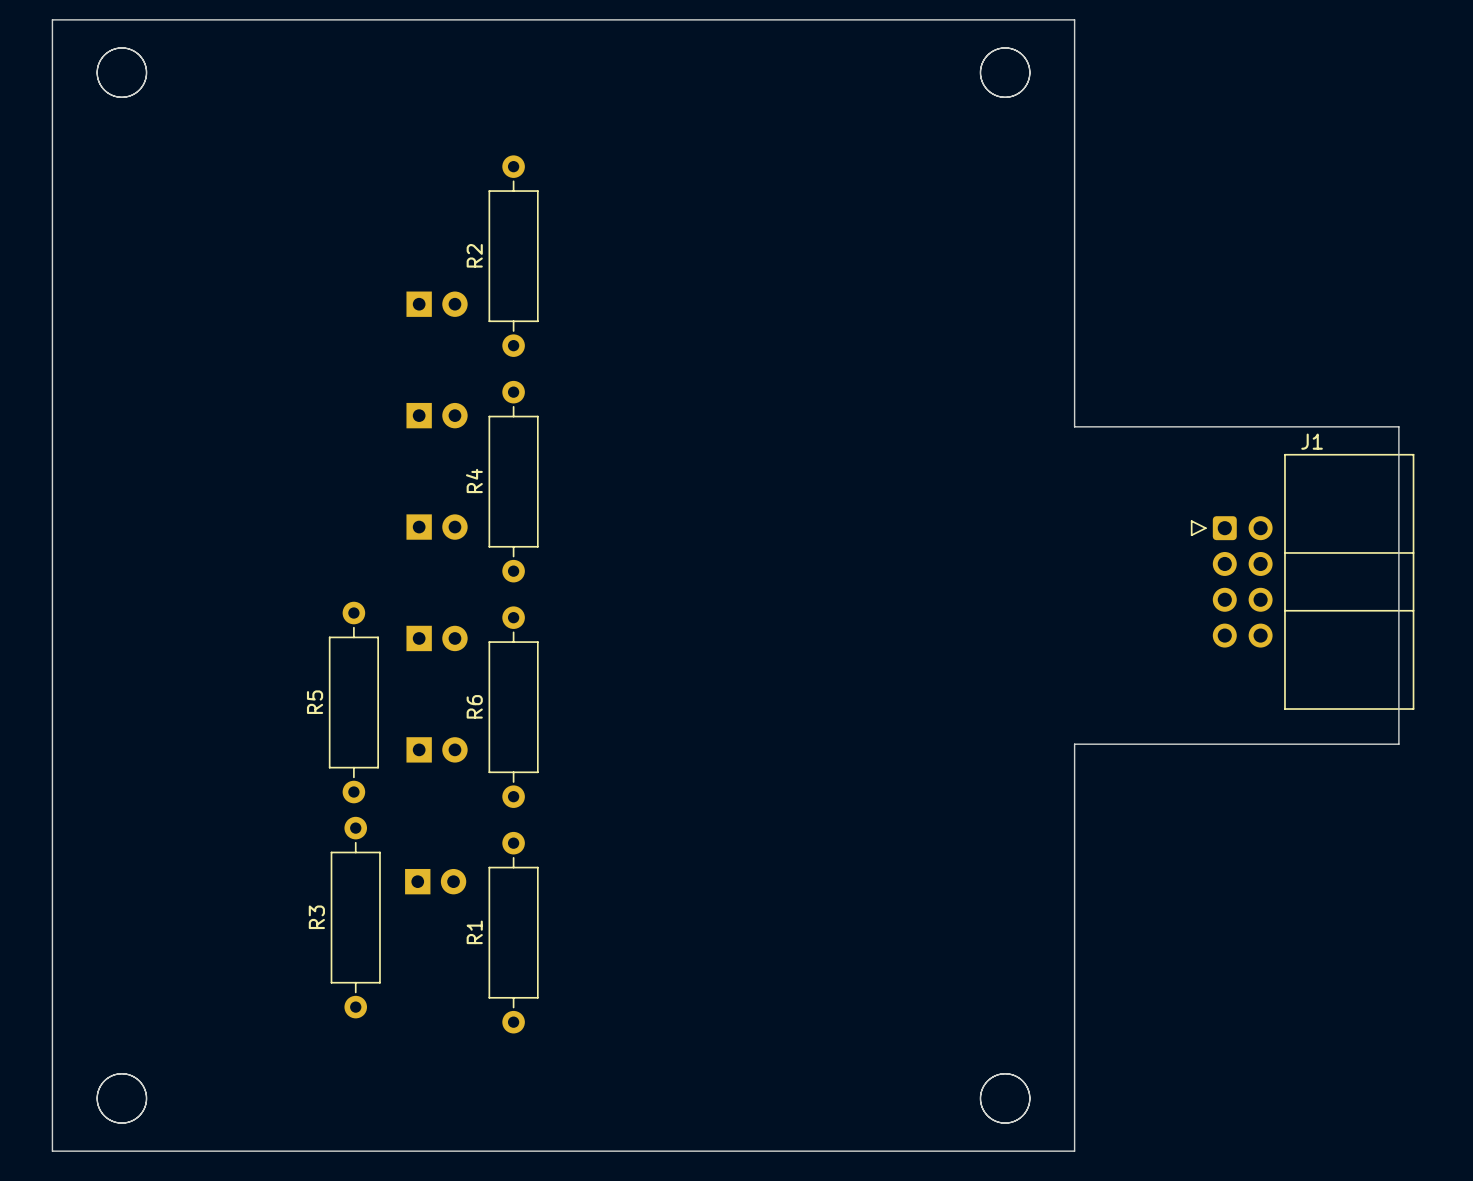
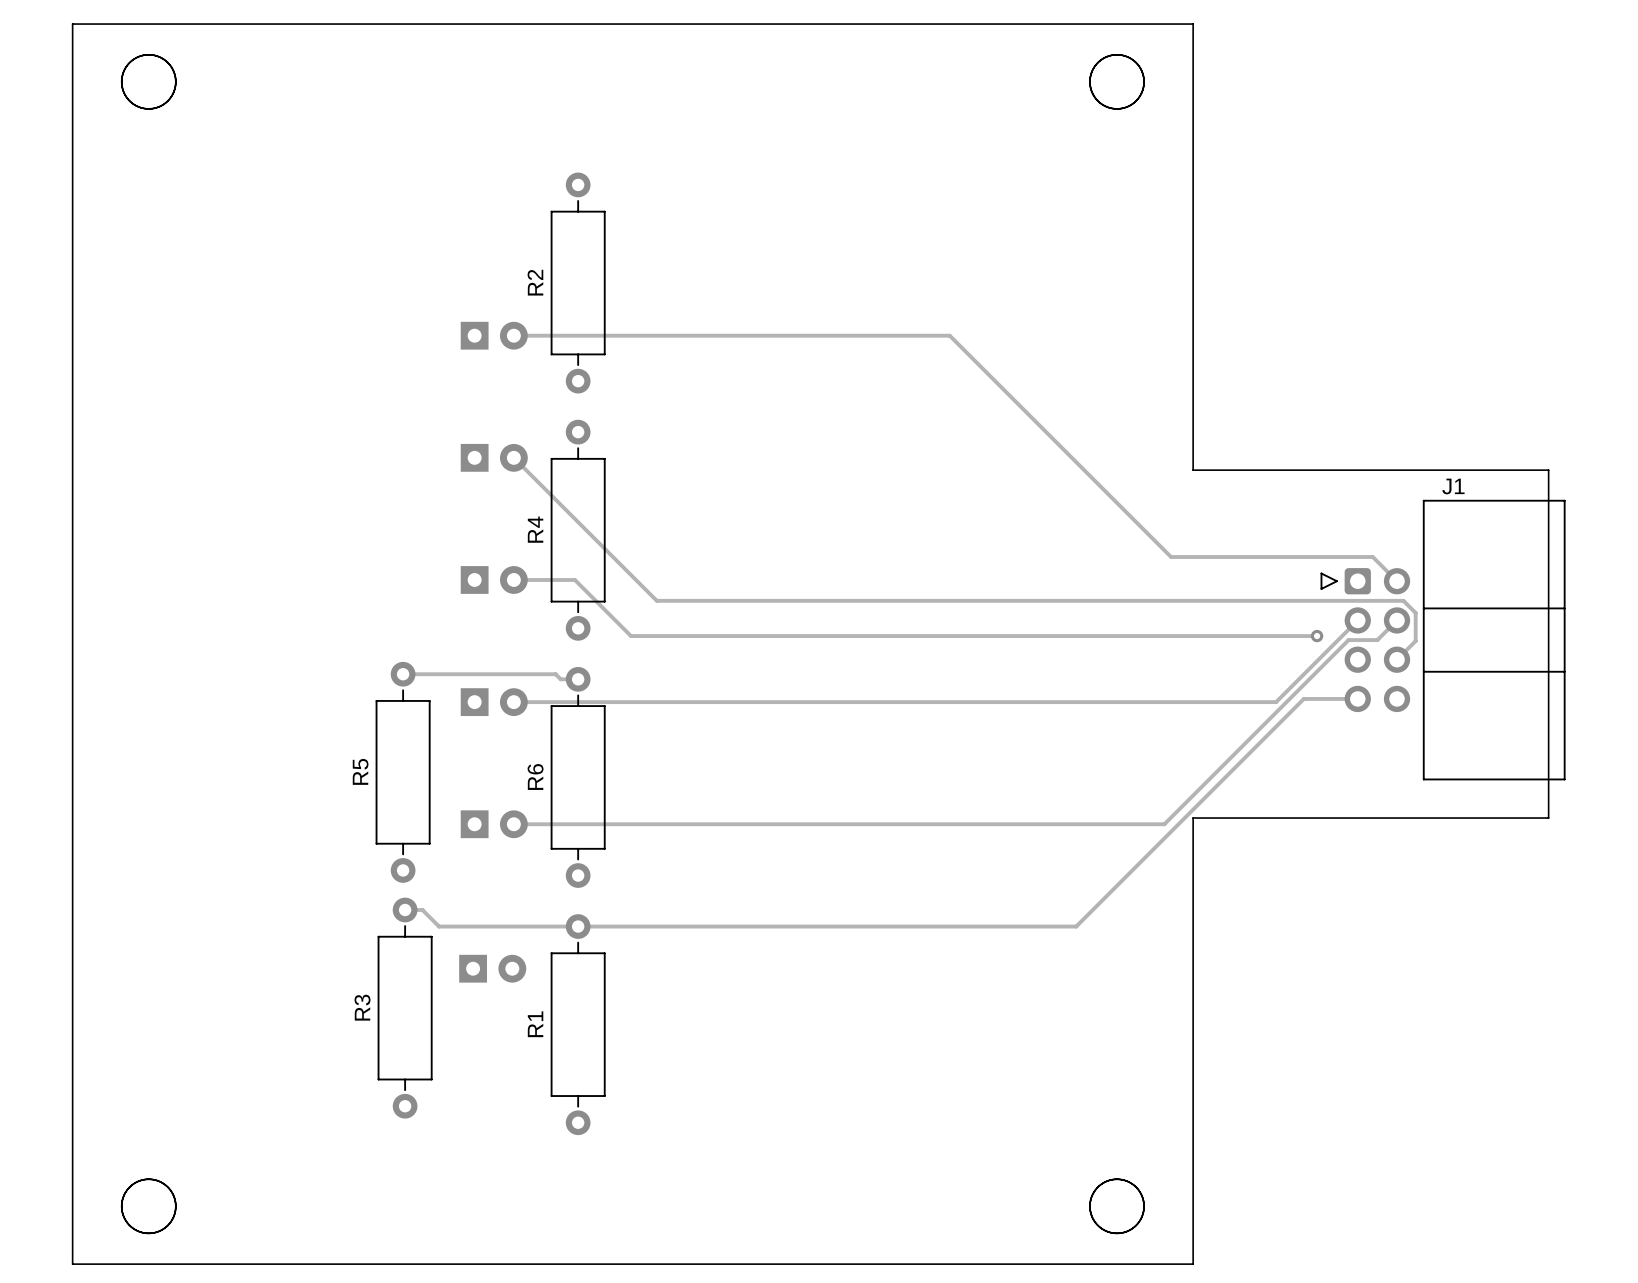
track: none -> (513, 335) (949, 335) (1171, 557) (1372, 557) (1397, 581)
track: none -> (513, 457) (656, 600) (1403, 600) (1415, 613) (1415, 641) (1397, 659)
track: none -> (513, 579) (574, 579) (631, 636) (1317, 636)
track: none -> (1357, 620) (1276, 702) (513, 702)
track: none -> (1397, 620) (1377, 640) (1348, 640) (1164, 824) (513, 824)
via: none -> (1317, 636)
track: none -> (403, 674) (555, 674) (560, 679) (578, 679)
track: none -> (1357, 698) (1303, 698) (1076, 926) (439, 926) (422, 910) (405, 910)

